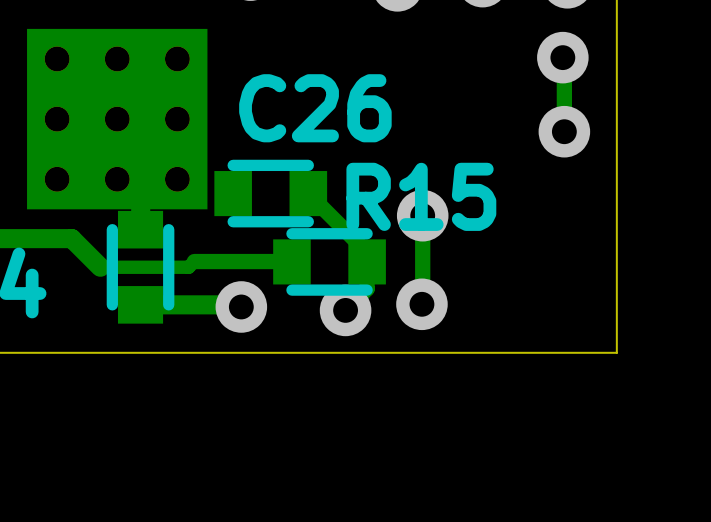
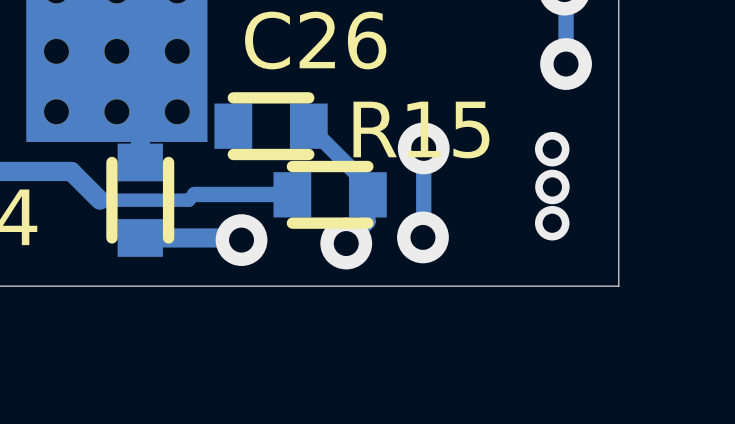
via: none -> (552, 149)
via: none -> (552, 186)
via: none -> (552, 223)

